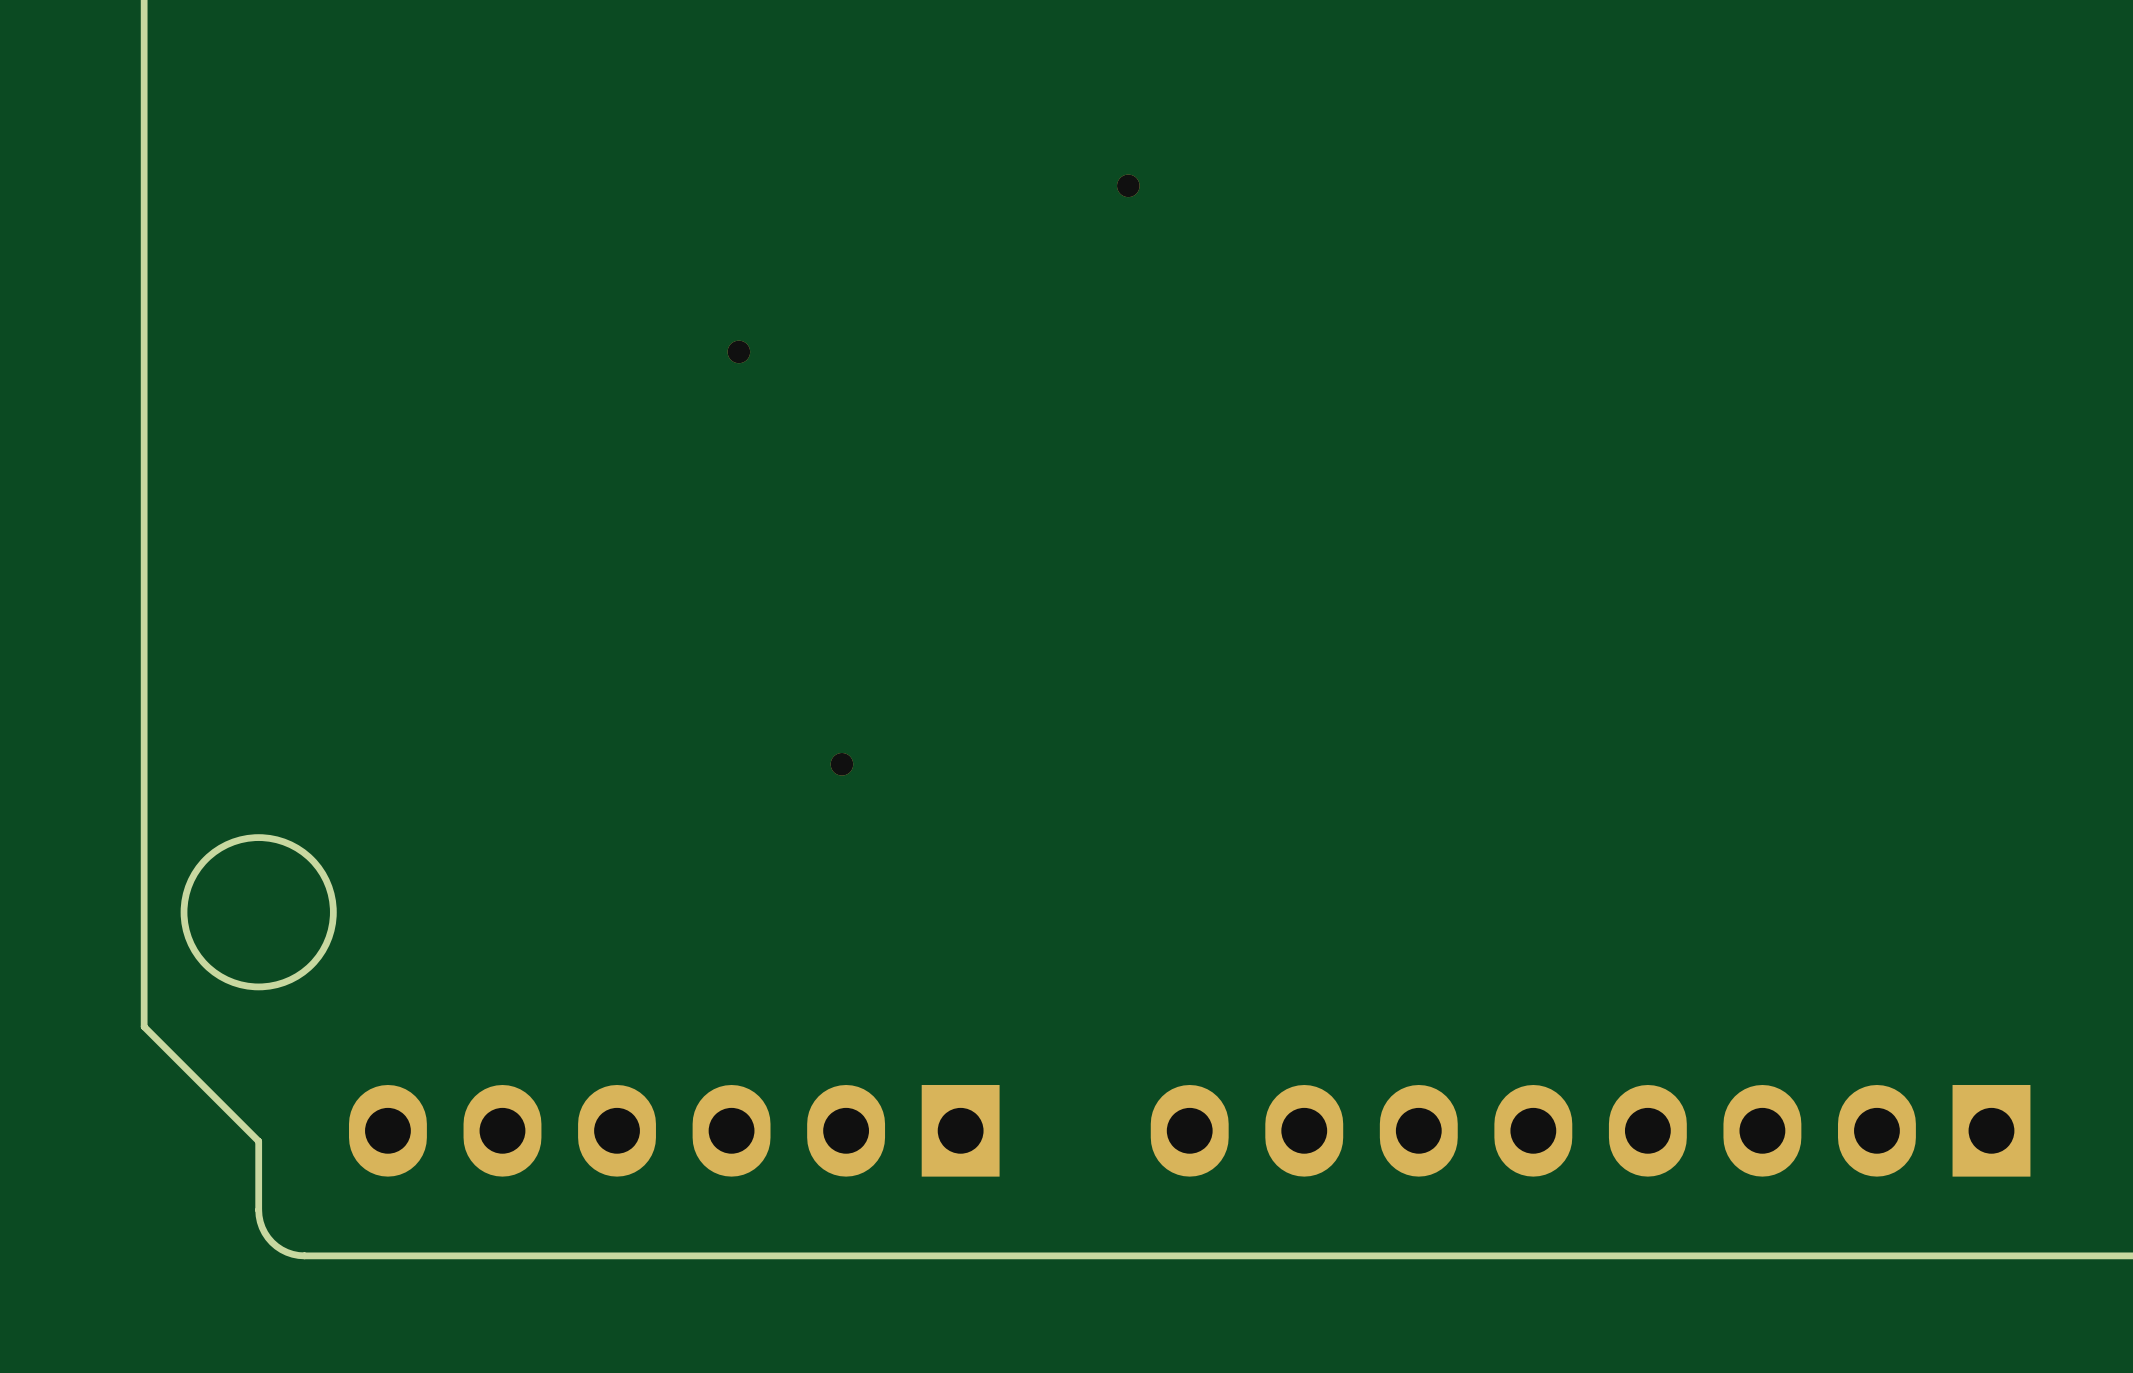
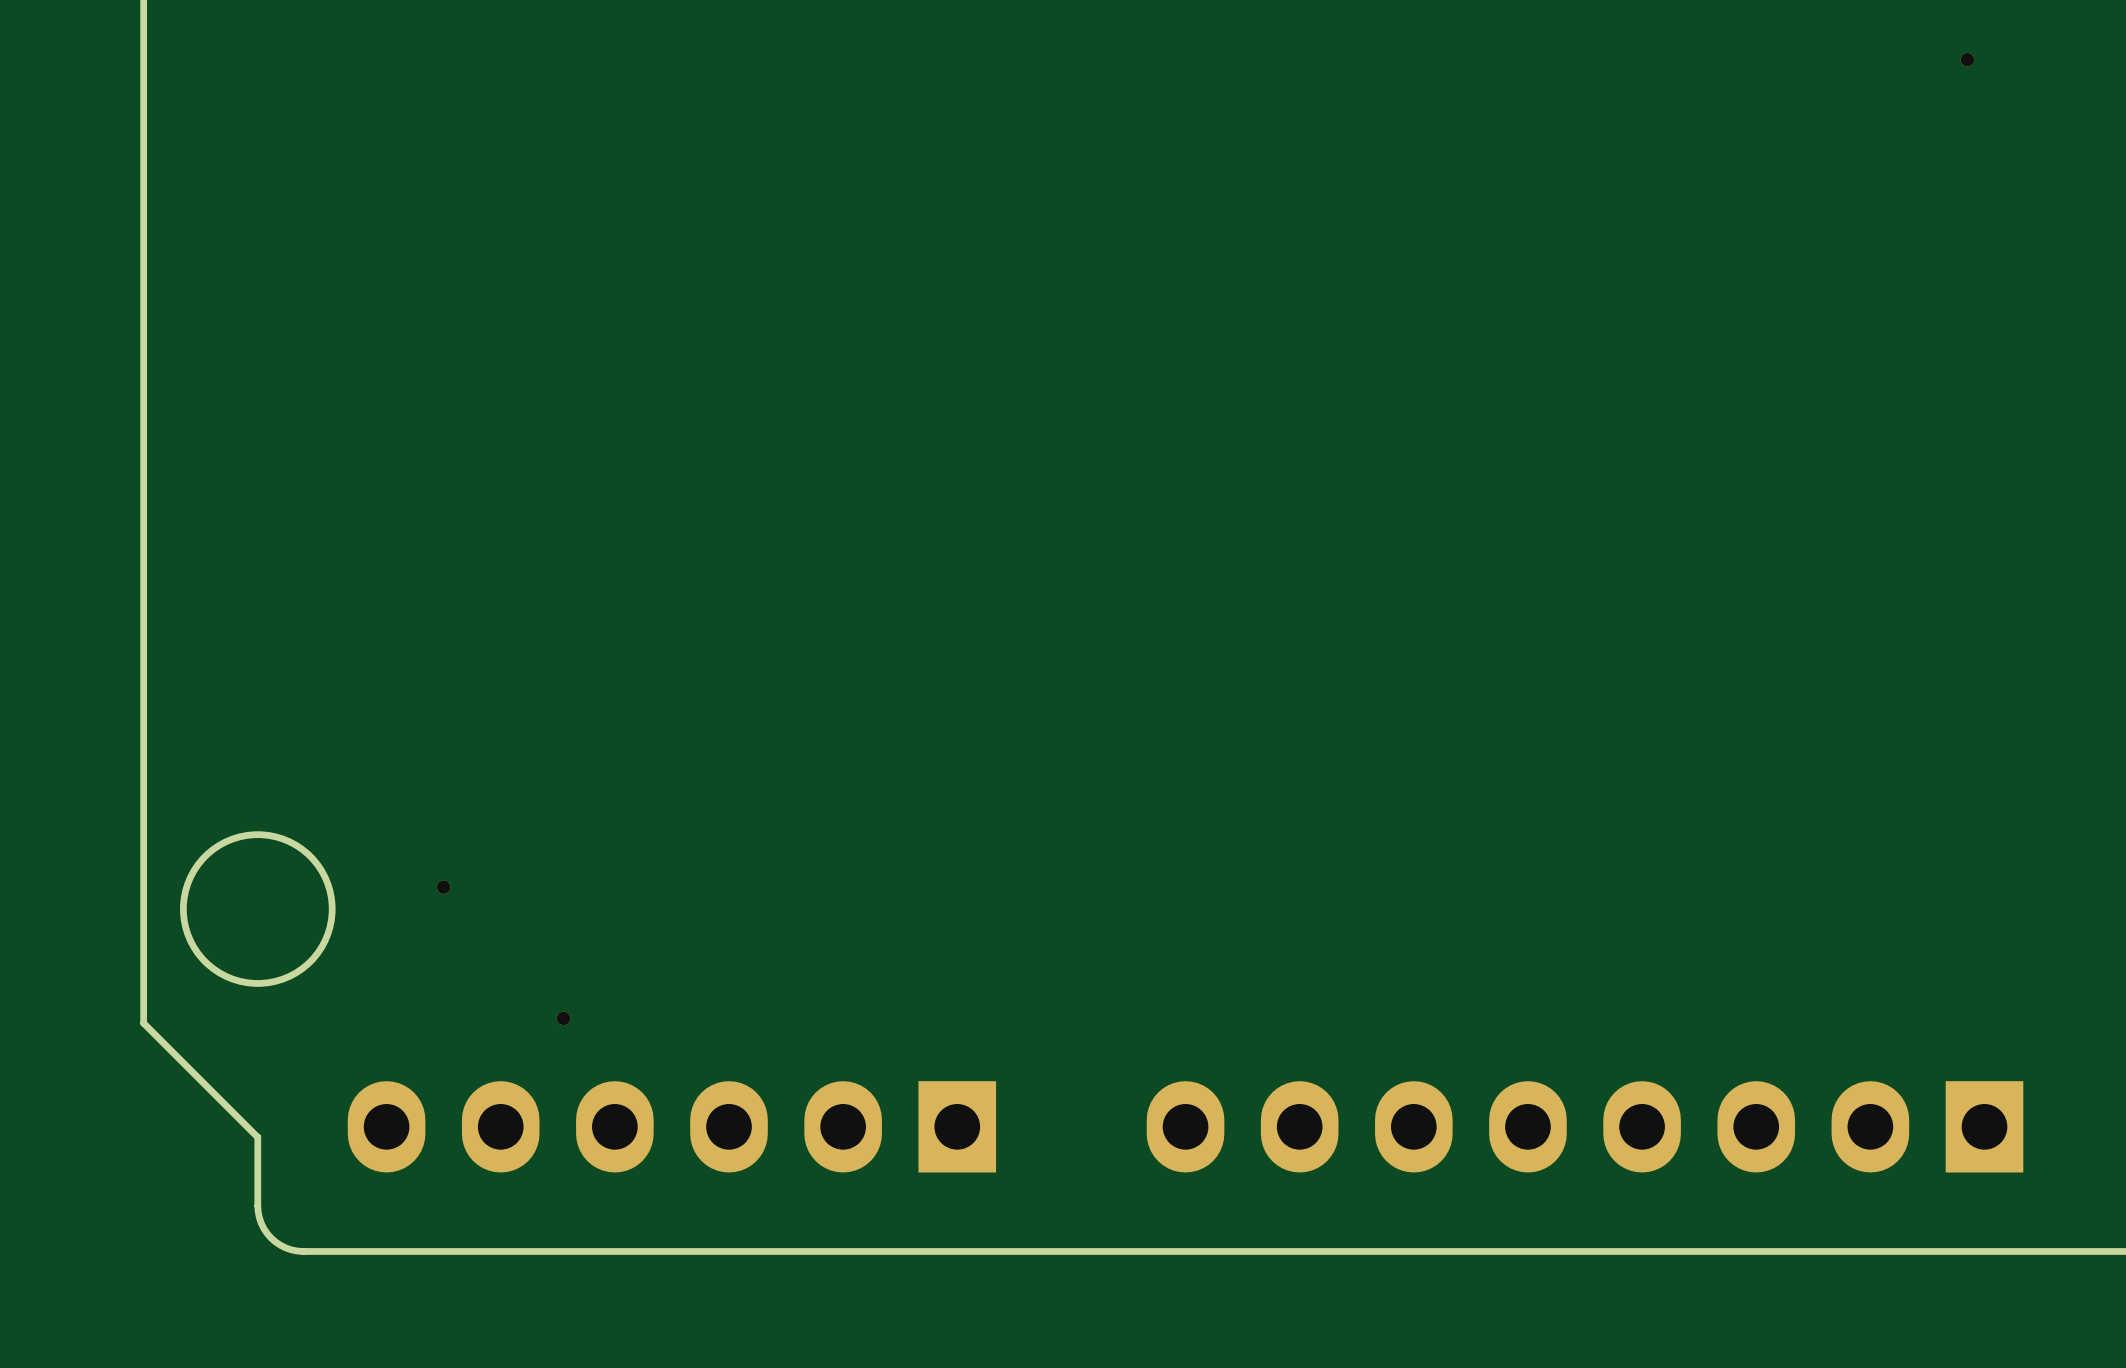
part: none -> (1967, 59)
part: (1128, 185) -> none
part: (738, 351) -> none
part: (841, 764) -> none
part: none -> (443, 887)
part: none -> (563, 1018)

